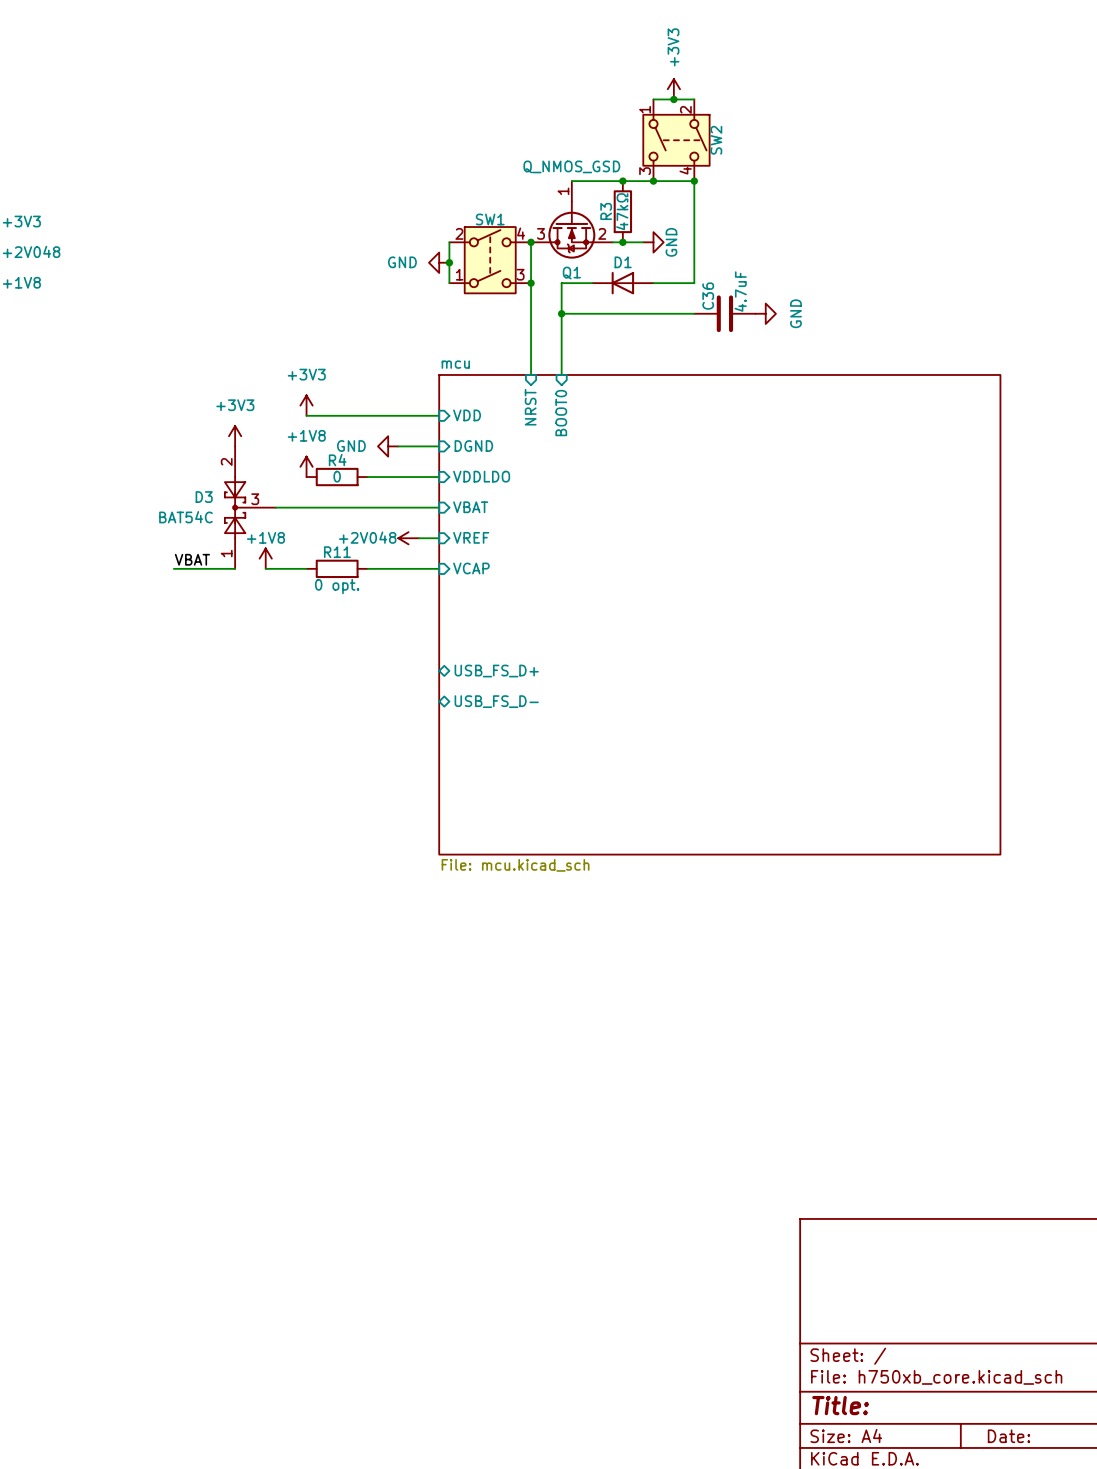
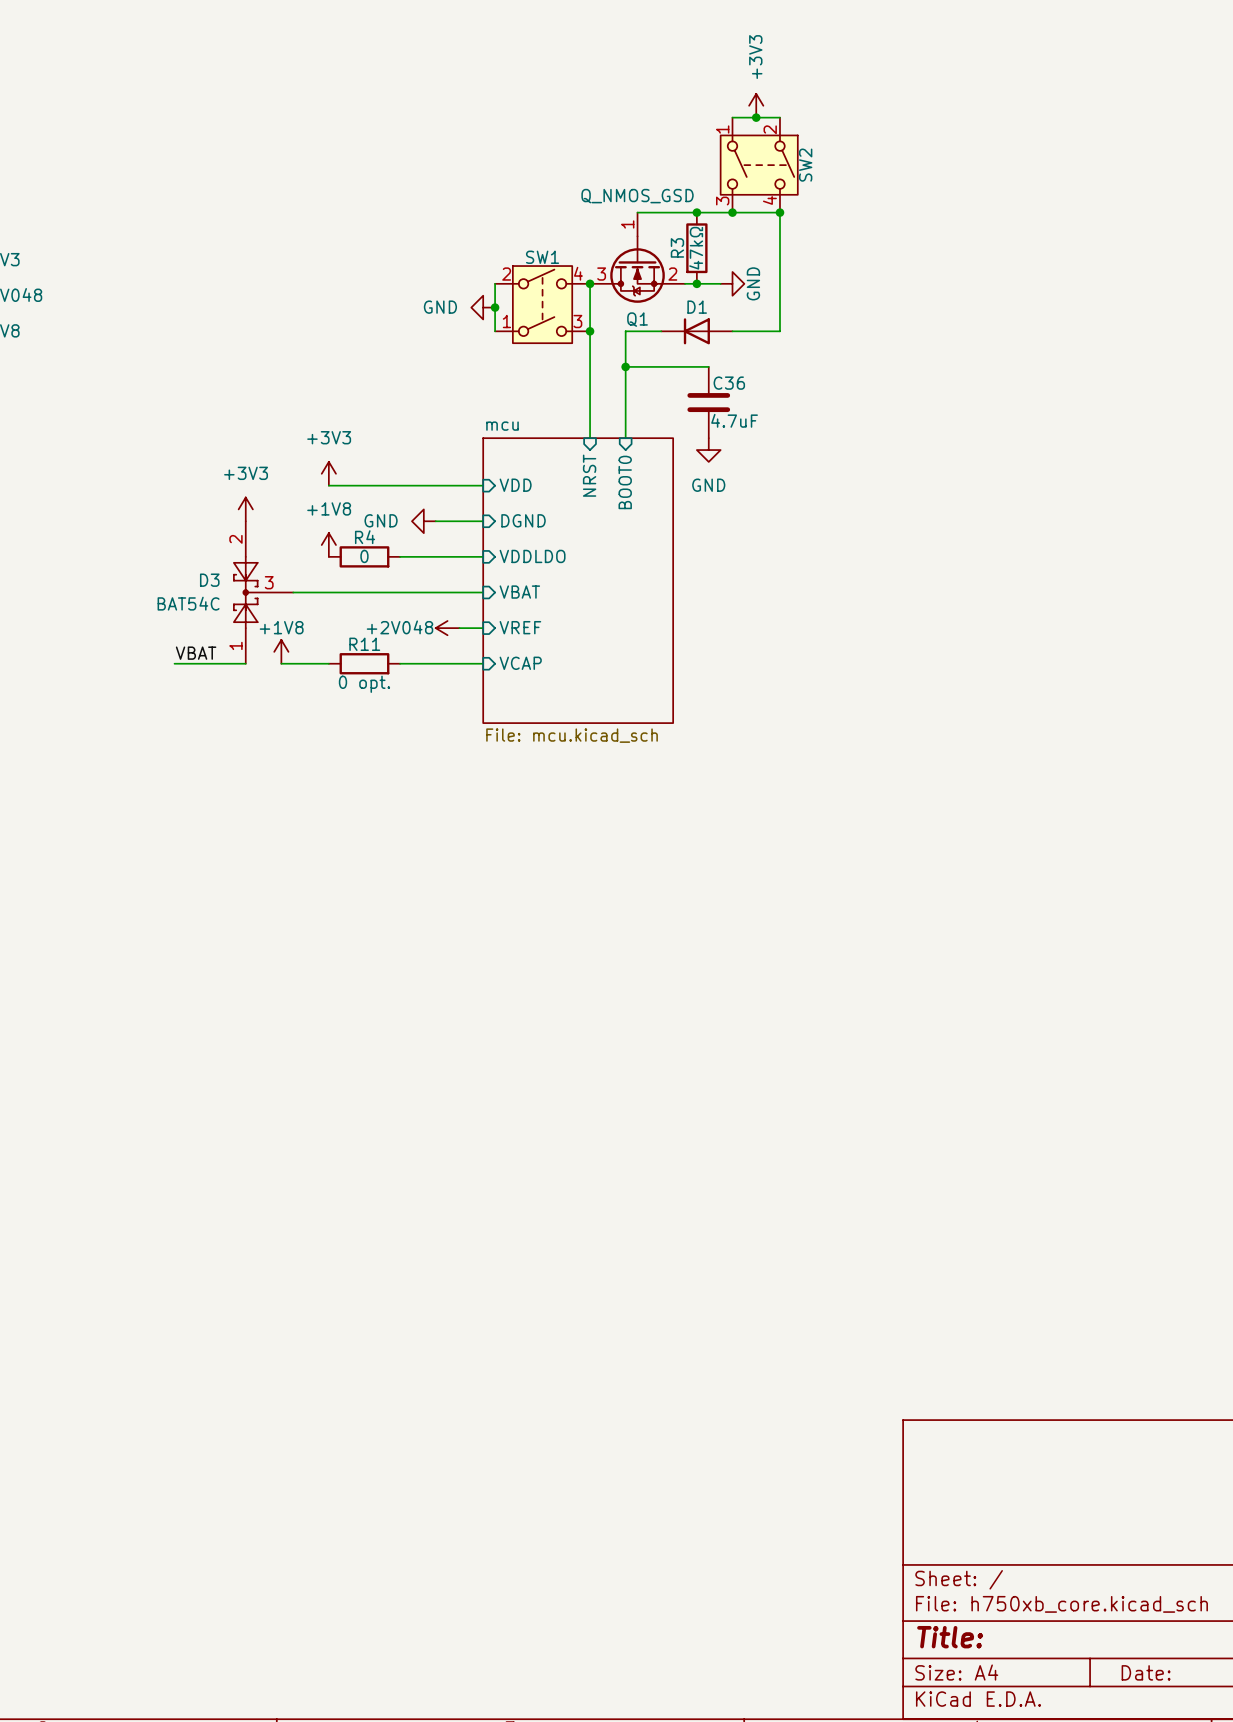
wire: (633, 313) (694, 313) -> none
C36 rotation: 0° (724, 313) -> 90° clockwise (708, 402)
C36 position: (724, 313) -> (708, 402)
power symbol rotation: 0° (765, 313) -> 90° clockwise (708, 450)
power symbol position: GND (765, 313) -> GND (708, 450)
sheet mcu: none -> File: mcu.kicad_sch (578, 580)
sheet mcu: File: mcu.kicad_sch (719, 614) -> none
sheet pin: USB_FS_D+ (496, 671) -> none
sheet pin: USB_FS_D- (496, 701) -> none

